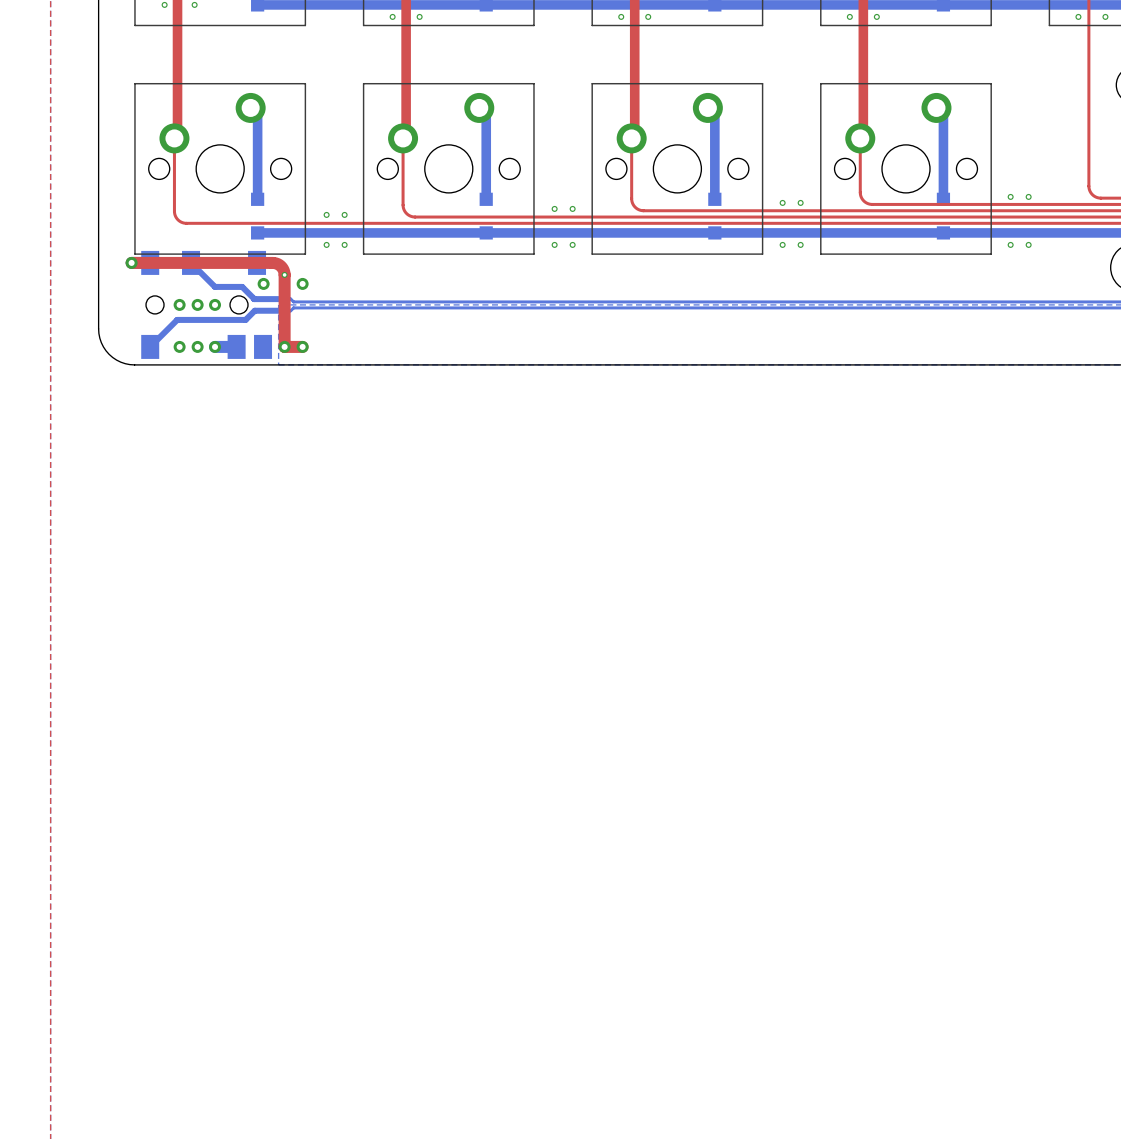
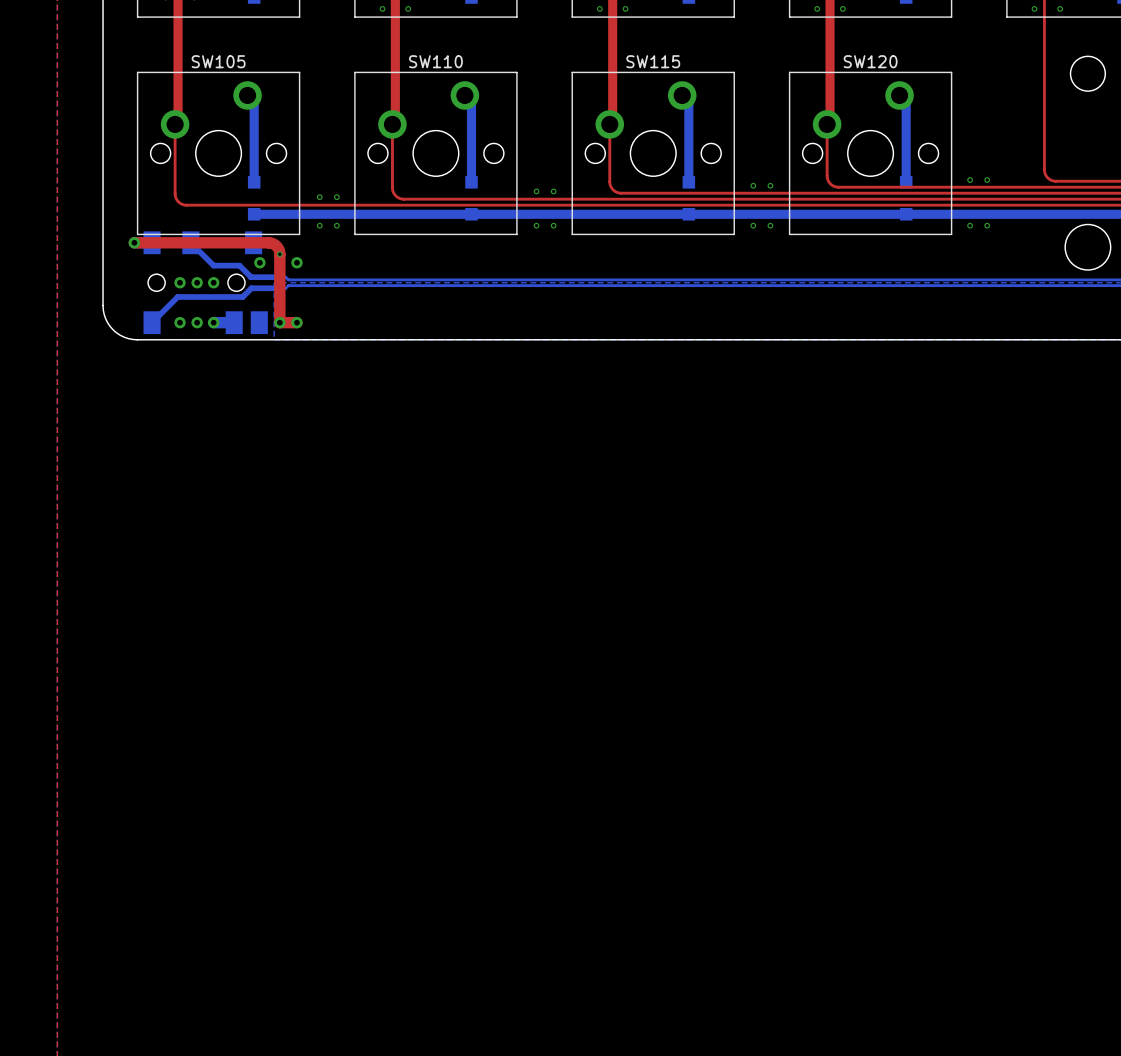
SW105 name: none -> SW105 (218, 61)
SW110 name: none -> SW110 (435, 61)
SW115 name: none -> SW115 (653, 61)
SW120 name: none -> SW120 (870, 61)

